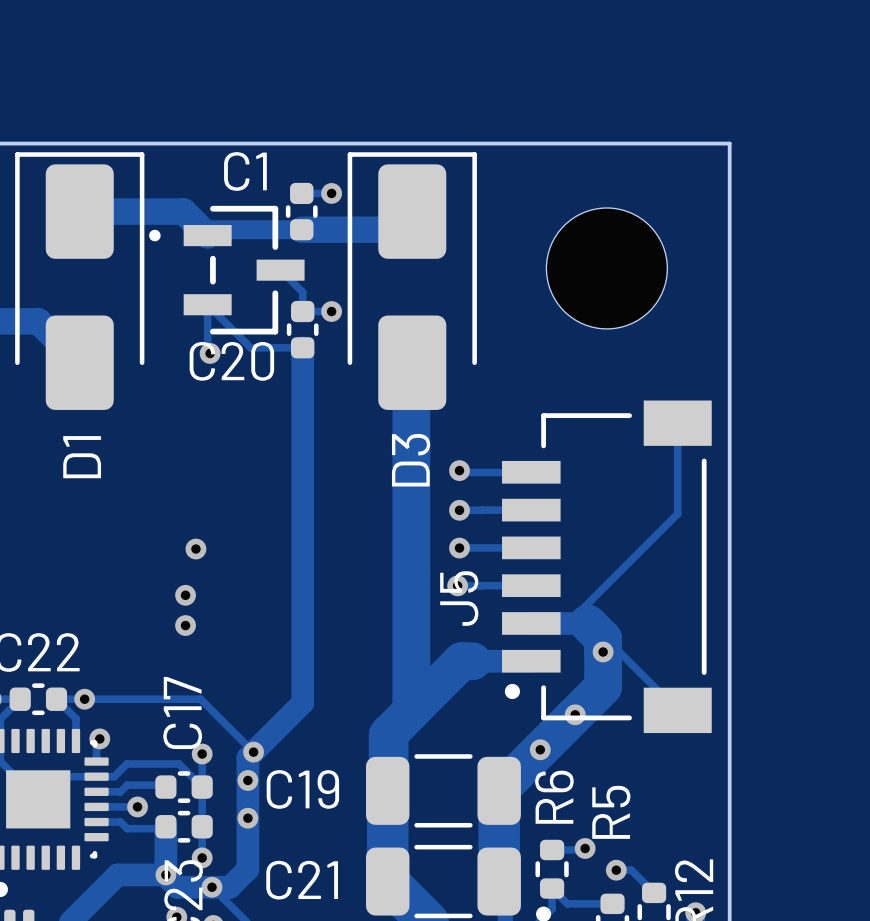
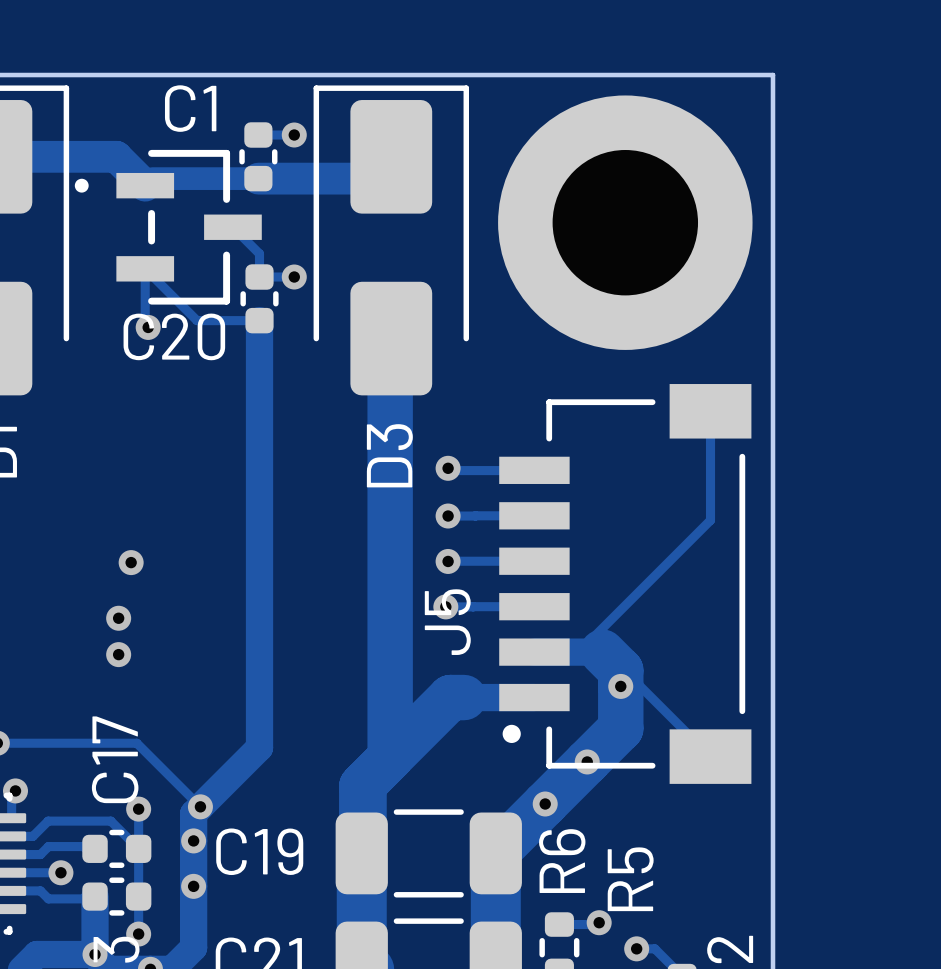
part footprint: [546, 207, 668, 329] -> [498, 95, 753, 350]

